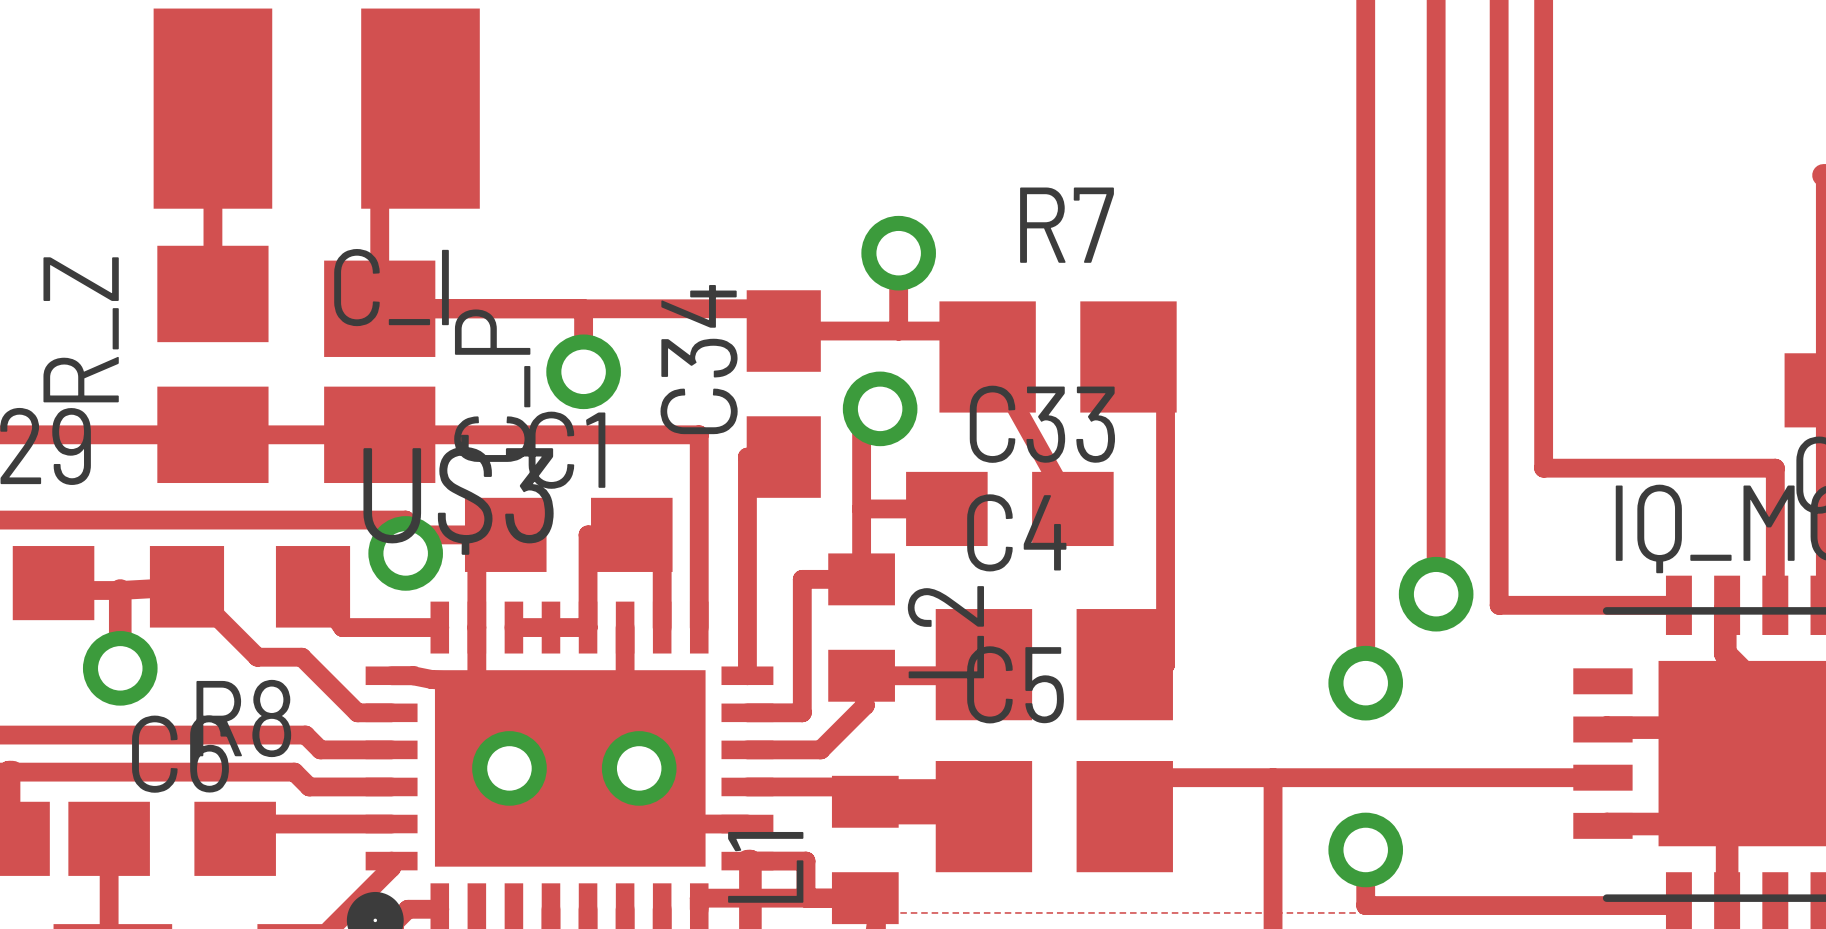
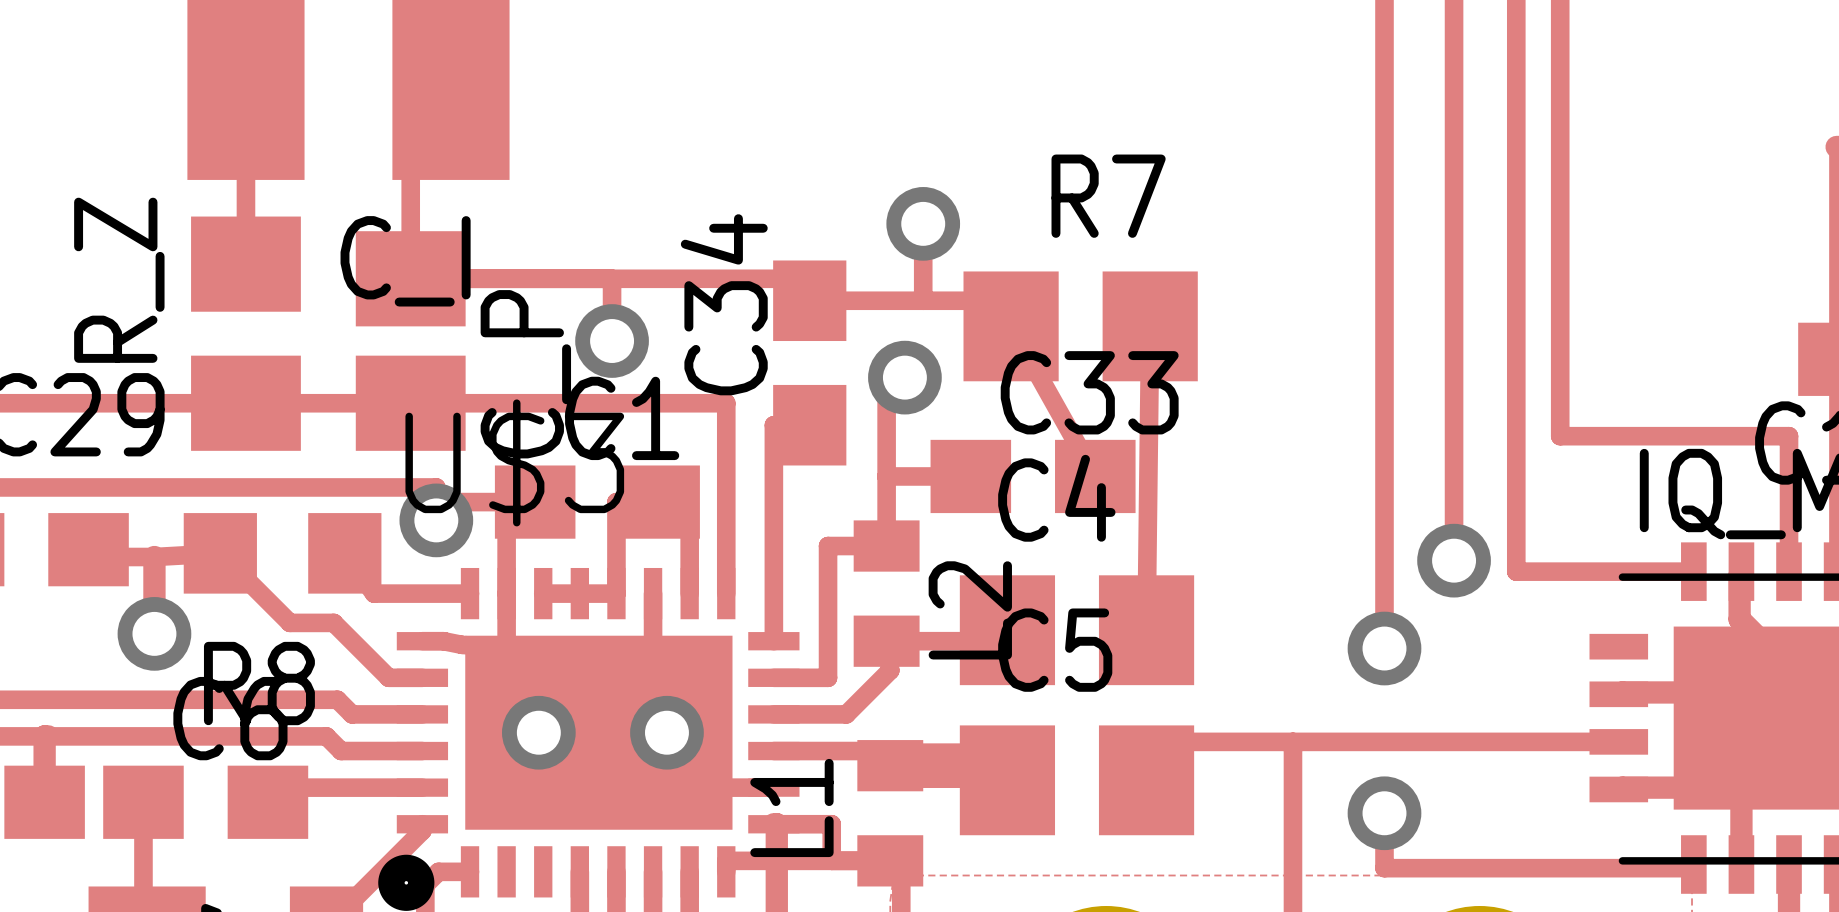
track: (1128, 356) (1128, 401) (1165, 401) (1165, 664) (1124, 664) -> (1150, 326) (1146, 630)

